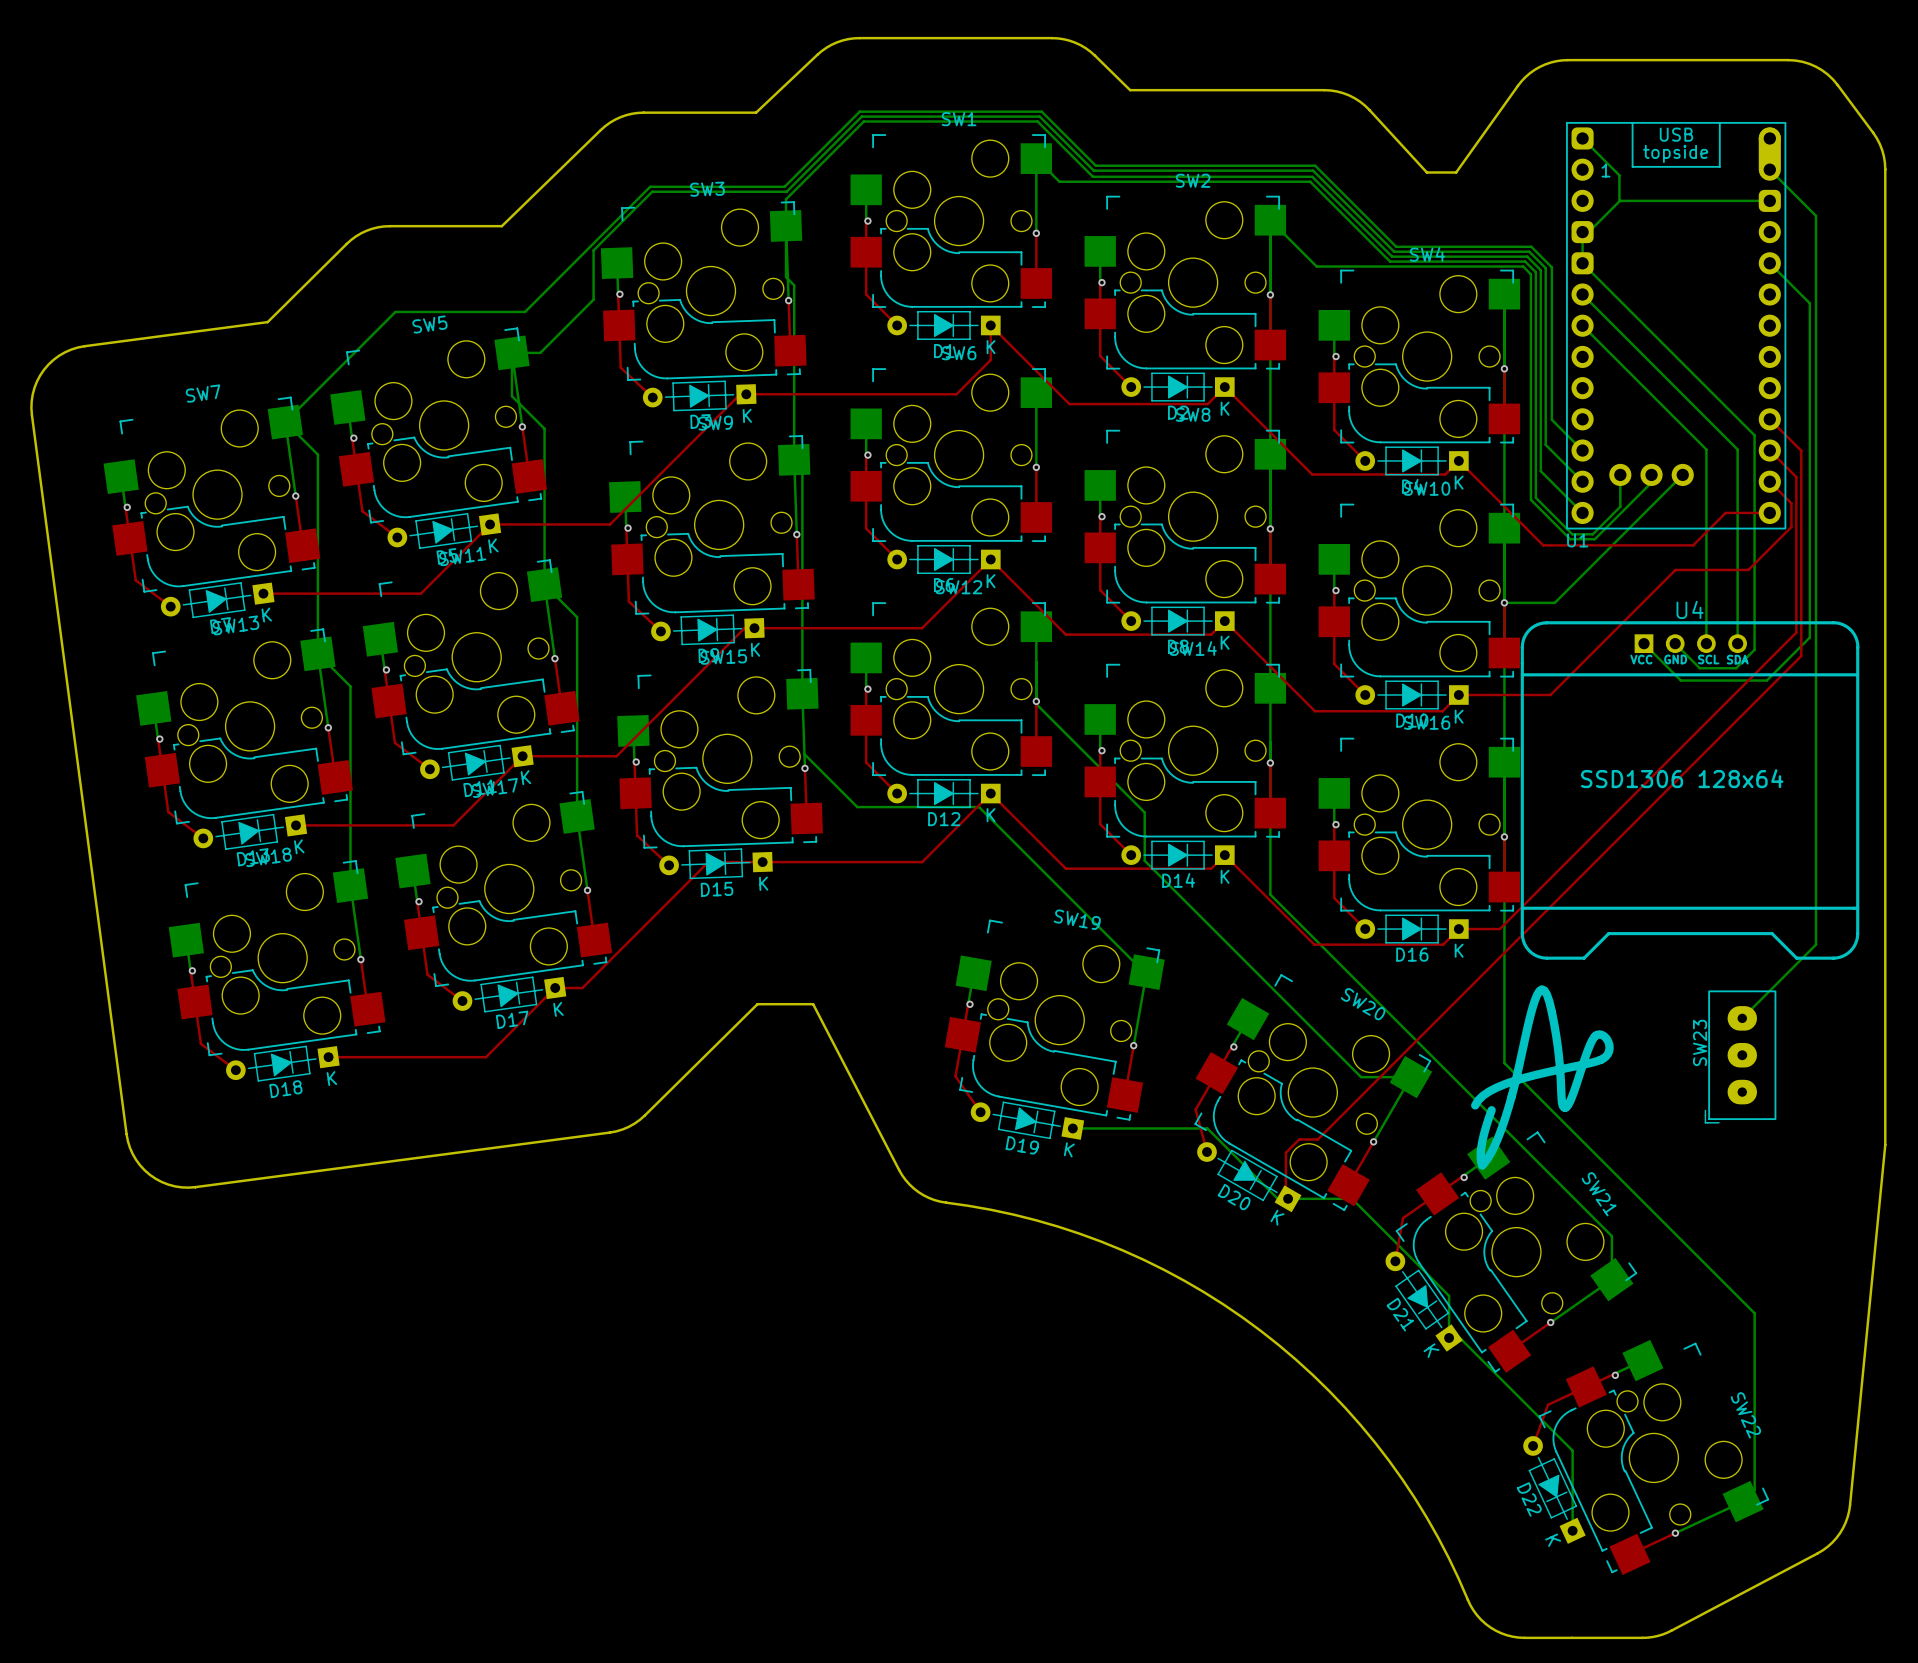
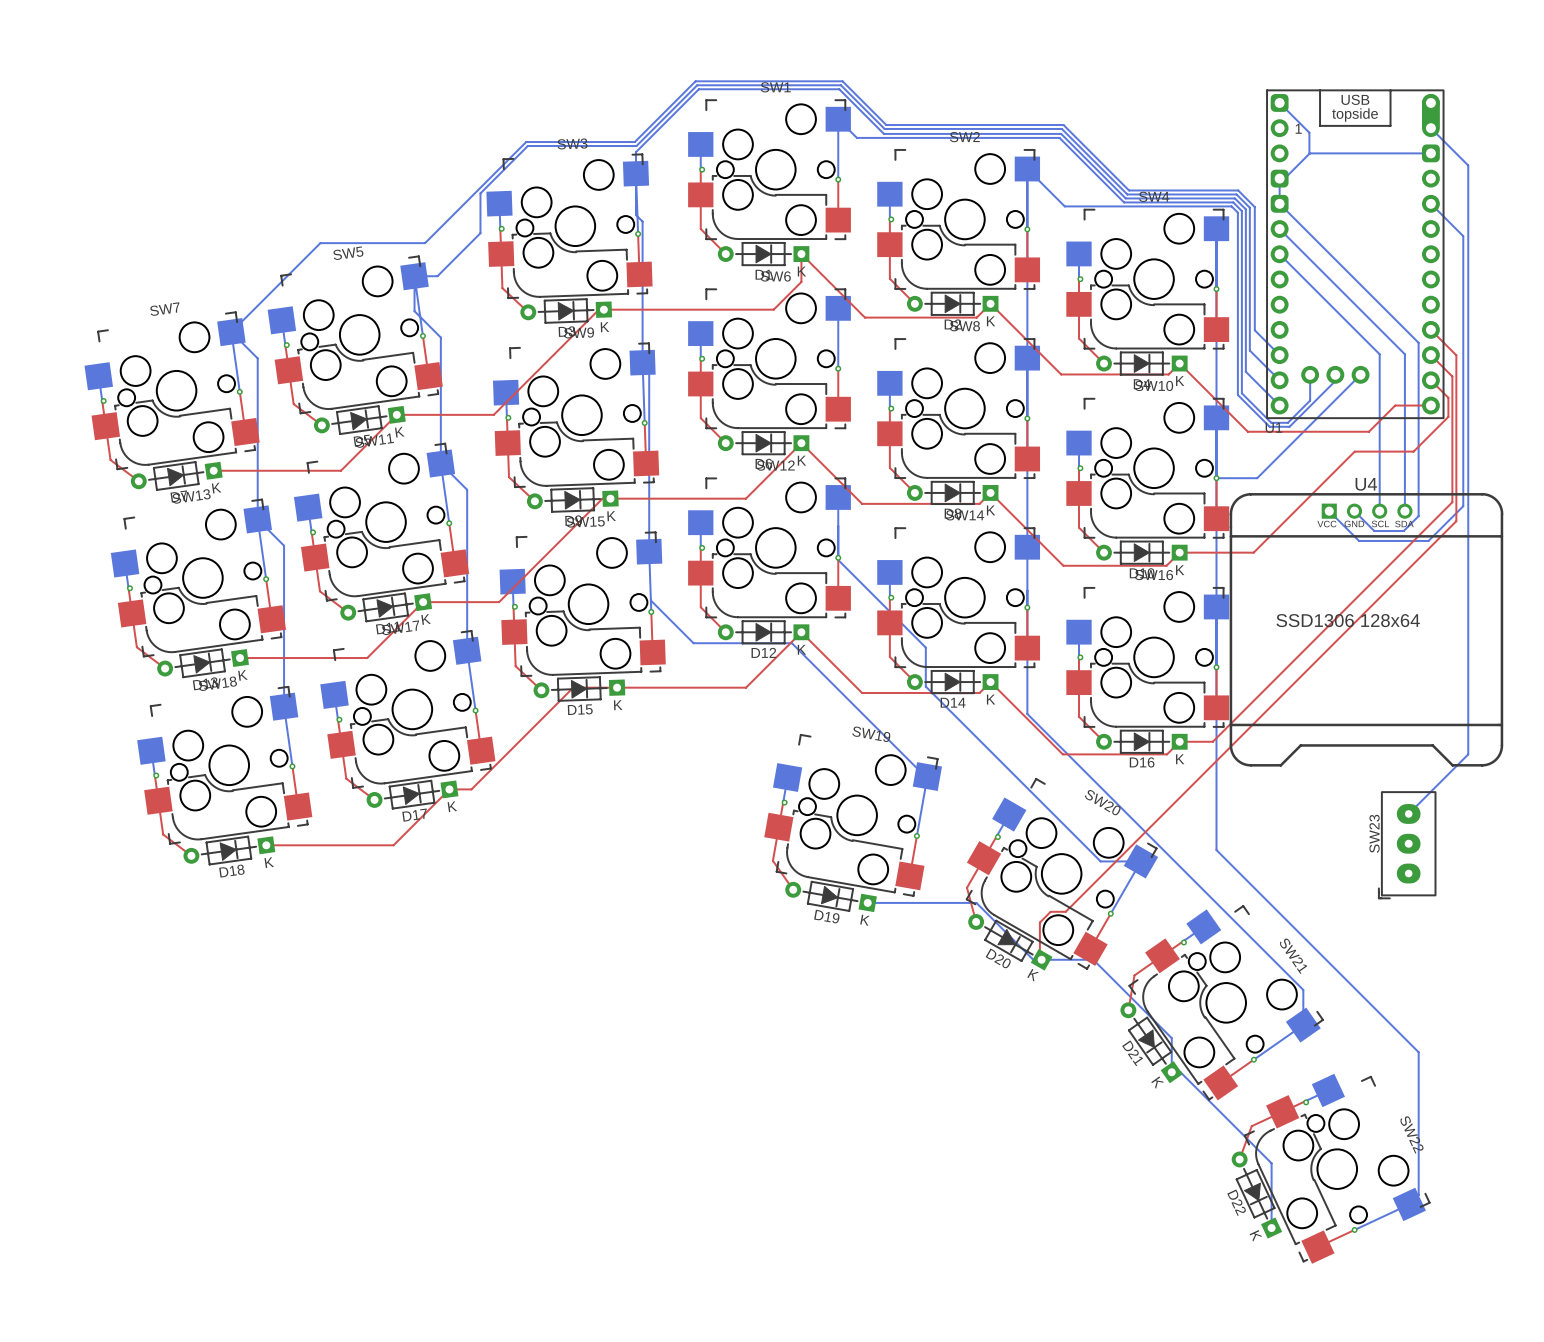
board edge: (859, 38) (1057, 38) (1075, 42) (1085, 48) (1130, 90) (1336, 91) (1354, 98) (1364, 105) (1426, 172) (1456, 172) (1521, 81) (1539, 66) (1562, 60) (1788, 60) (1802, 61) (1822, 70) (1833, 79) (1876, 138) (1882, 150) (1885, 169) (1885, 1144) (1849, 1511) (1839, 1533) (1822, 1550) (1671, 1630) (1657, 1636) (1642, 1637) (1524, 1637) (1506, 1635) (1495, 1630) (1481, 1619) (1473, 1610) (1427, 1517) (1402, 1479) (1375, 1442) (1345, 1407) (1313, 1375) (1260, 1330) (1223, 1304) (1184, 1280) (1122, 1250) (1079, 1233) (1035, 1220) (934, 1200) (913, 1188) (899, 1169) (813, 1004) (757, 1004) (644, 1115) (628, 1126) (616, 1131) (188, 1187) (174, 1186) (155, 1178) (144, 1170) (136, 1159) (129, 1147) (126, 1134) (31, 415) (32, 394) (40, 375) (48, 364) (59, 355) (78, 347) (267, 322) (351, 239) (372, 228) (389, 226) (501, 226) (600, 130) (615, 119) (637, 112) (756, 112) (821, 51) (836, 42) (859, 38) -> none
line: (1475, 1105) (1483, 1095) (1505, 1083) (1515, 1080) (1525, 1077) (1535, 1075) (1556, 1070) (1566, 1068) (1575, 1066) (1583, 1064) (1590, 1062) (1600, 1059) (1608, 1051) (1607, 1040) (1601, 1034) (1593, 1037) (1588, 1049) (1583, 1061) (1581, 1067) (1577, 1080) (1573, 1092) (1570, 1101) (1566, 1106) (1564, 1107) (1562, 1102) (1560, 1072) (1559, 1064) (1558, 1055) (1554, 1024) (1546, 994) (1541, 989) (1537, 994) (1532, 1008) (1527, 1027) (1519, 1062) (1517, 1073) (1514, 1085) (1504, 1121) (1493, 1148) (1482, 1165) (1481, 1144) (1491, 1110) -> none

